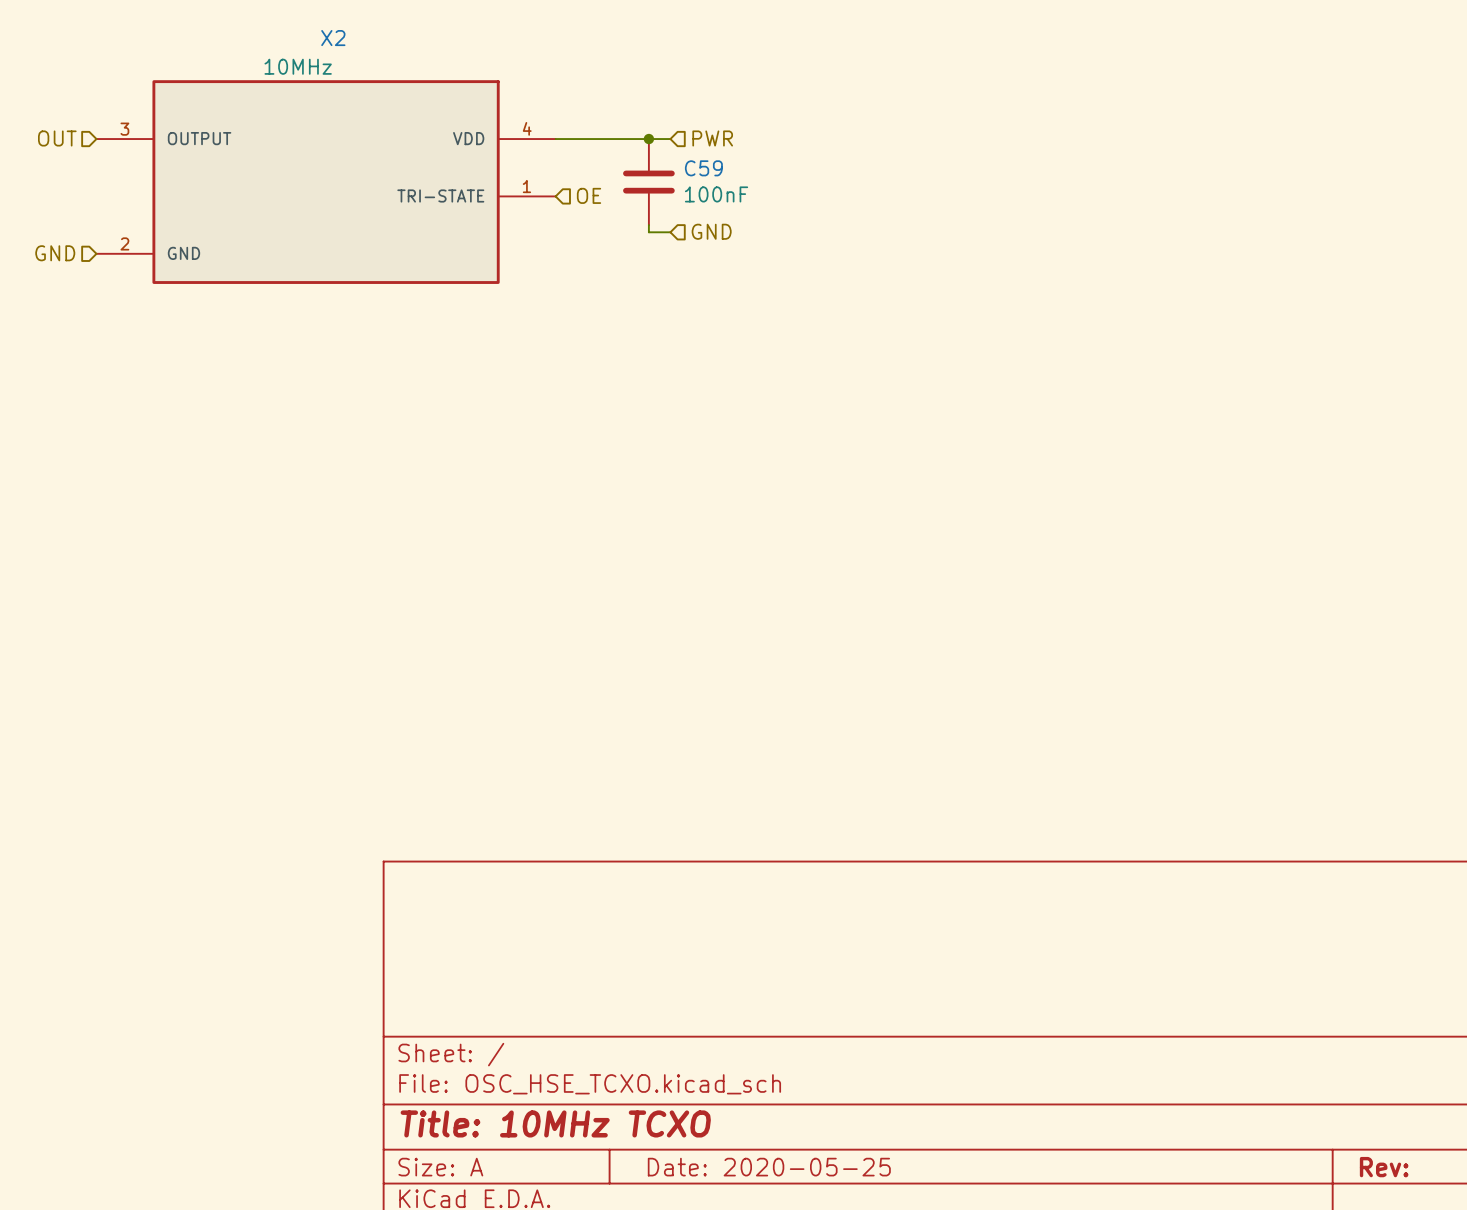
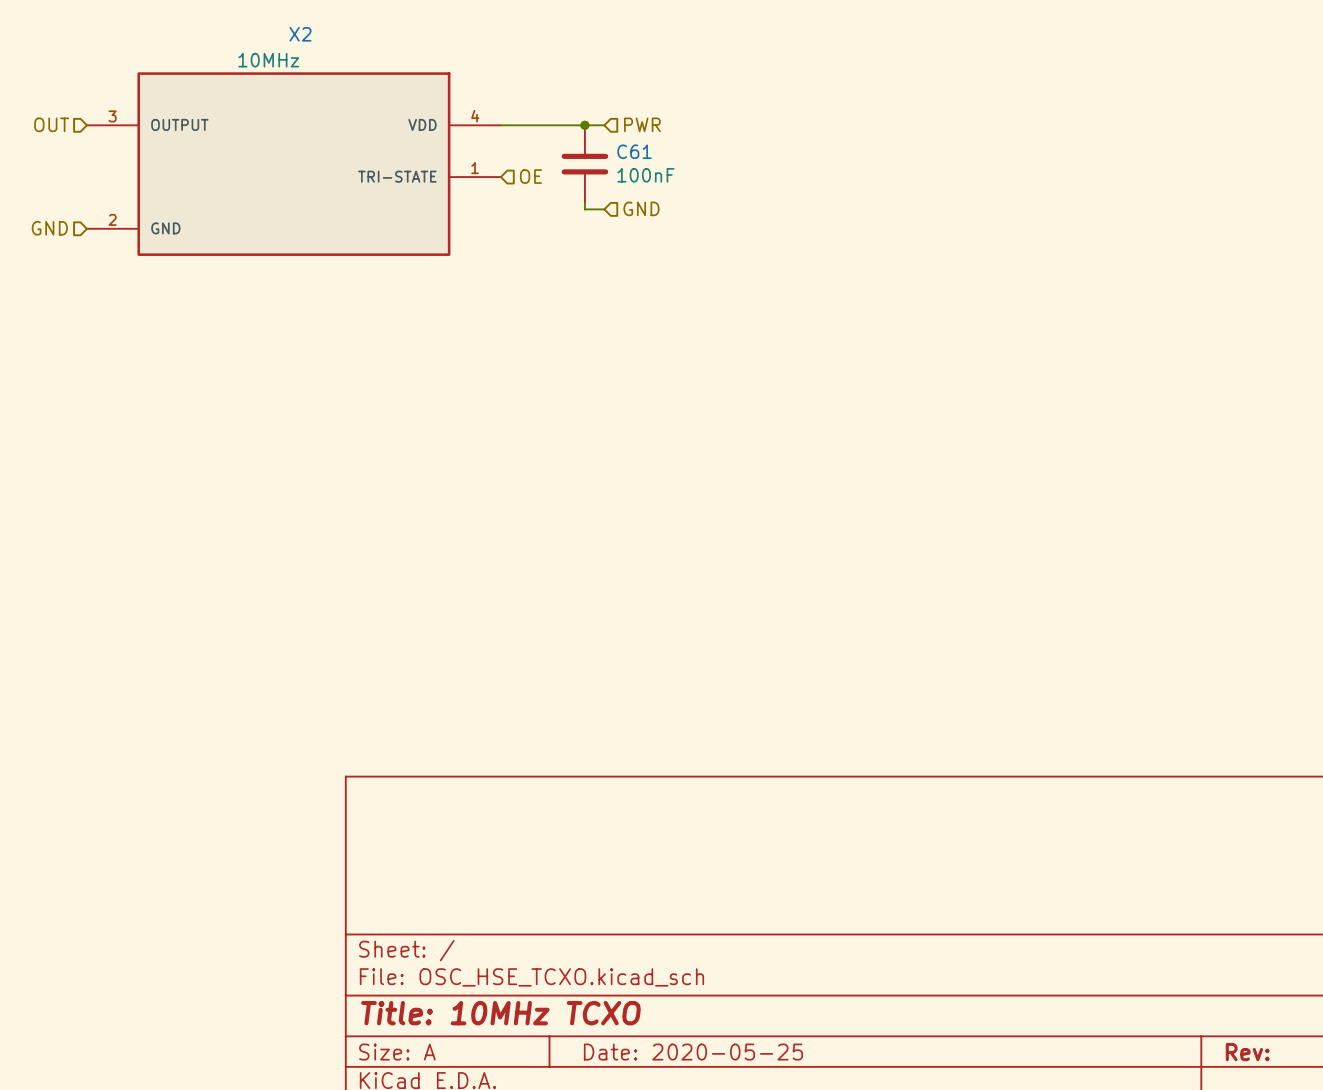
C59 name: C59 (703, 168) -> C61 (634, 151)

